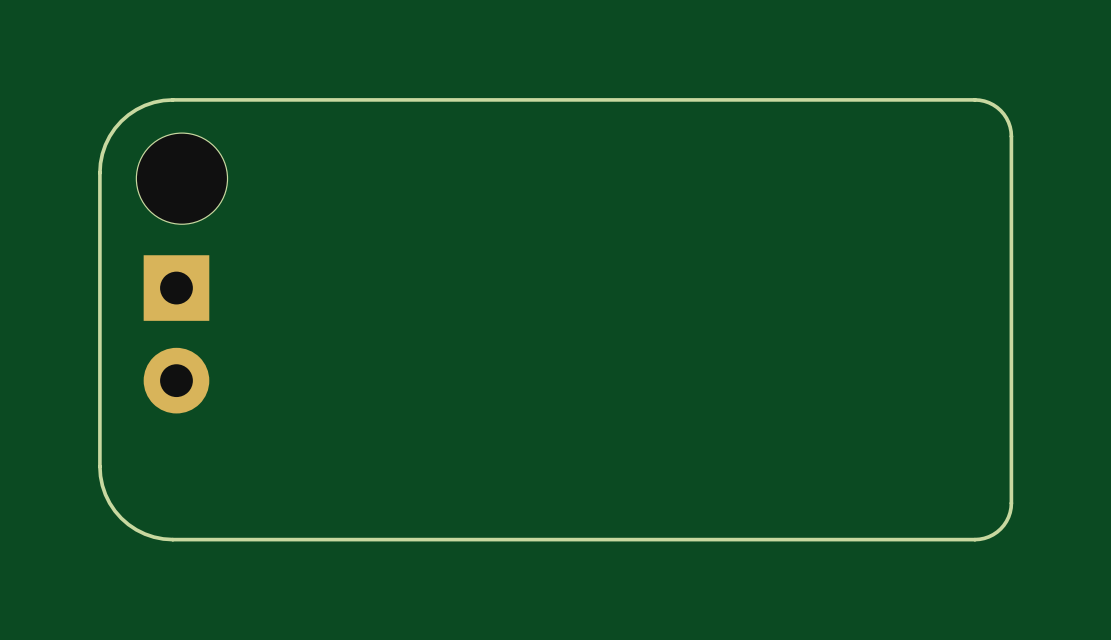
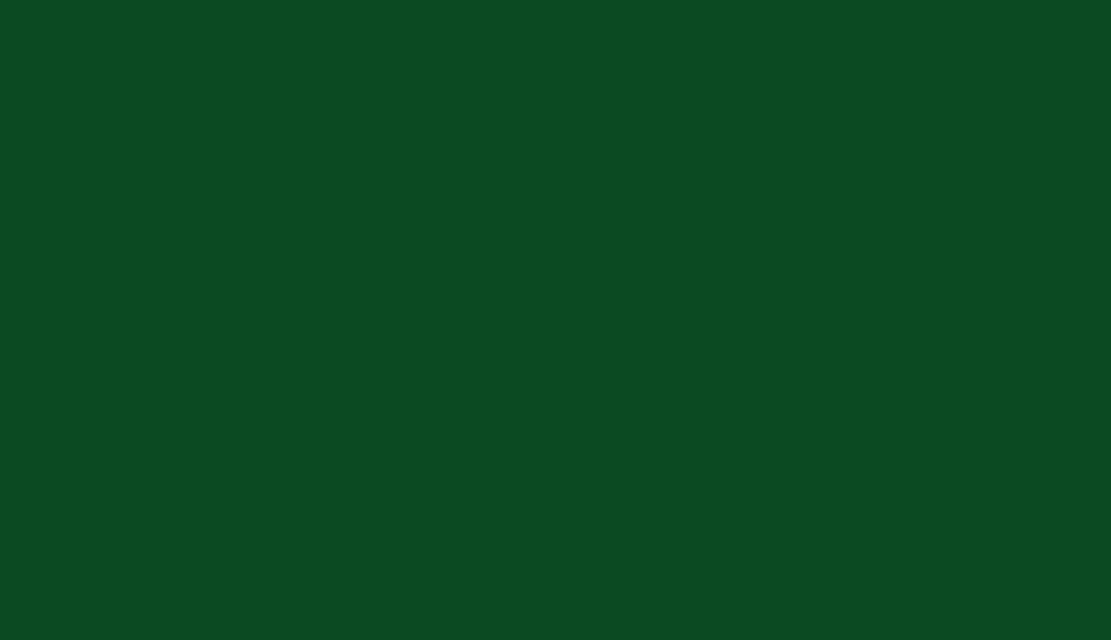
board edge: (974, 99) (172, 99) (144, 105) (128, 114) (114, 128) (105, 144) (100, 163) (99, 466) (105, 494) (114, 511) (128, 524) (153, 537) (172, 539) (974, 539) (988, 536) (1003, 525) (1008, 517) (1011, 503) (1011, 136) (1008, 122) (1000, 110) (988, 102) (974, 99) -> none
part: (181, 178) -> none
part: (176, 334) -> none

